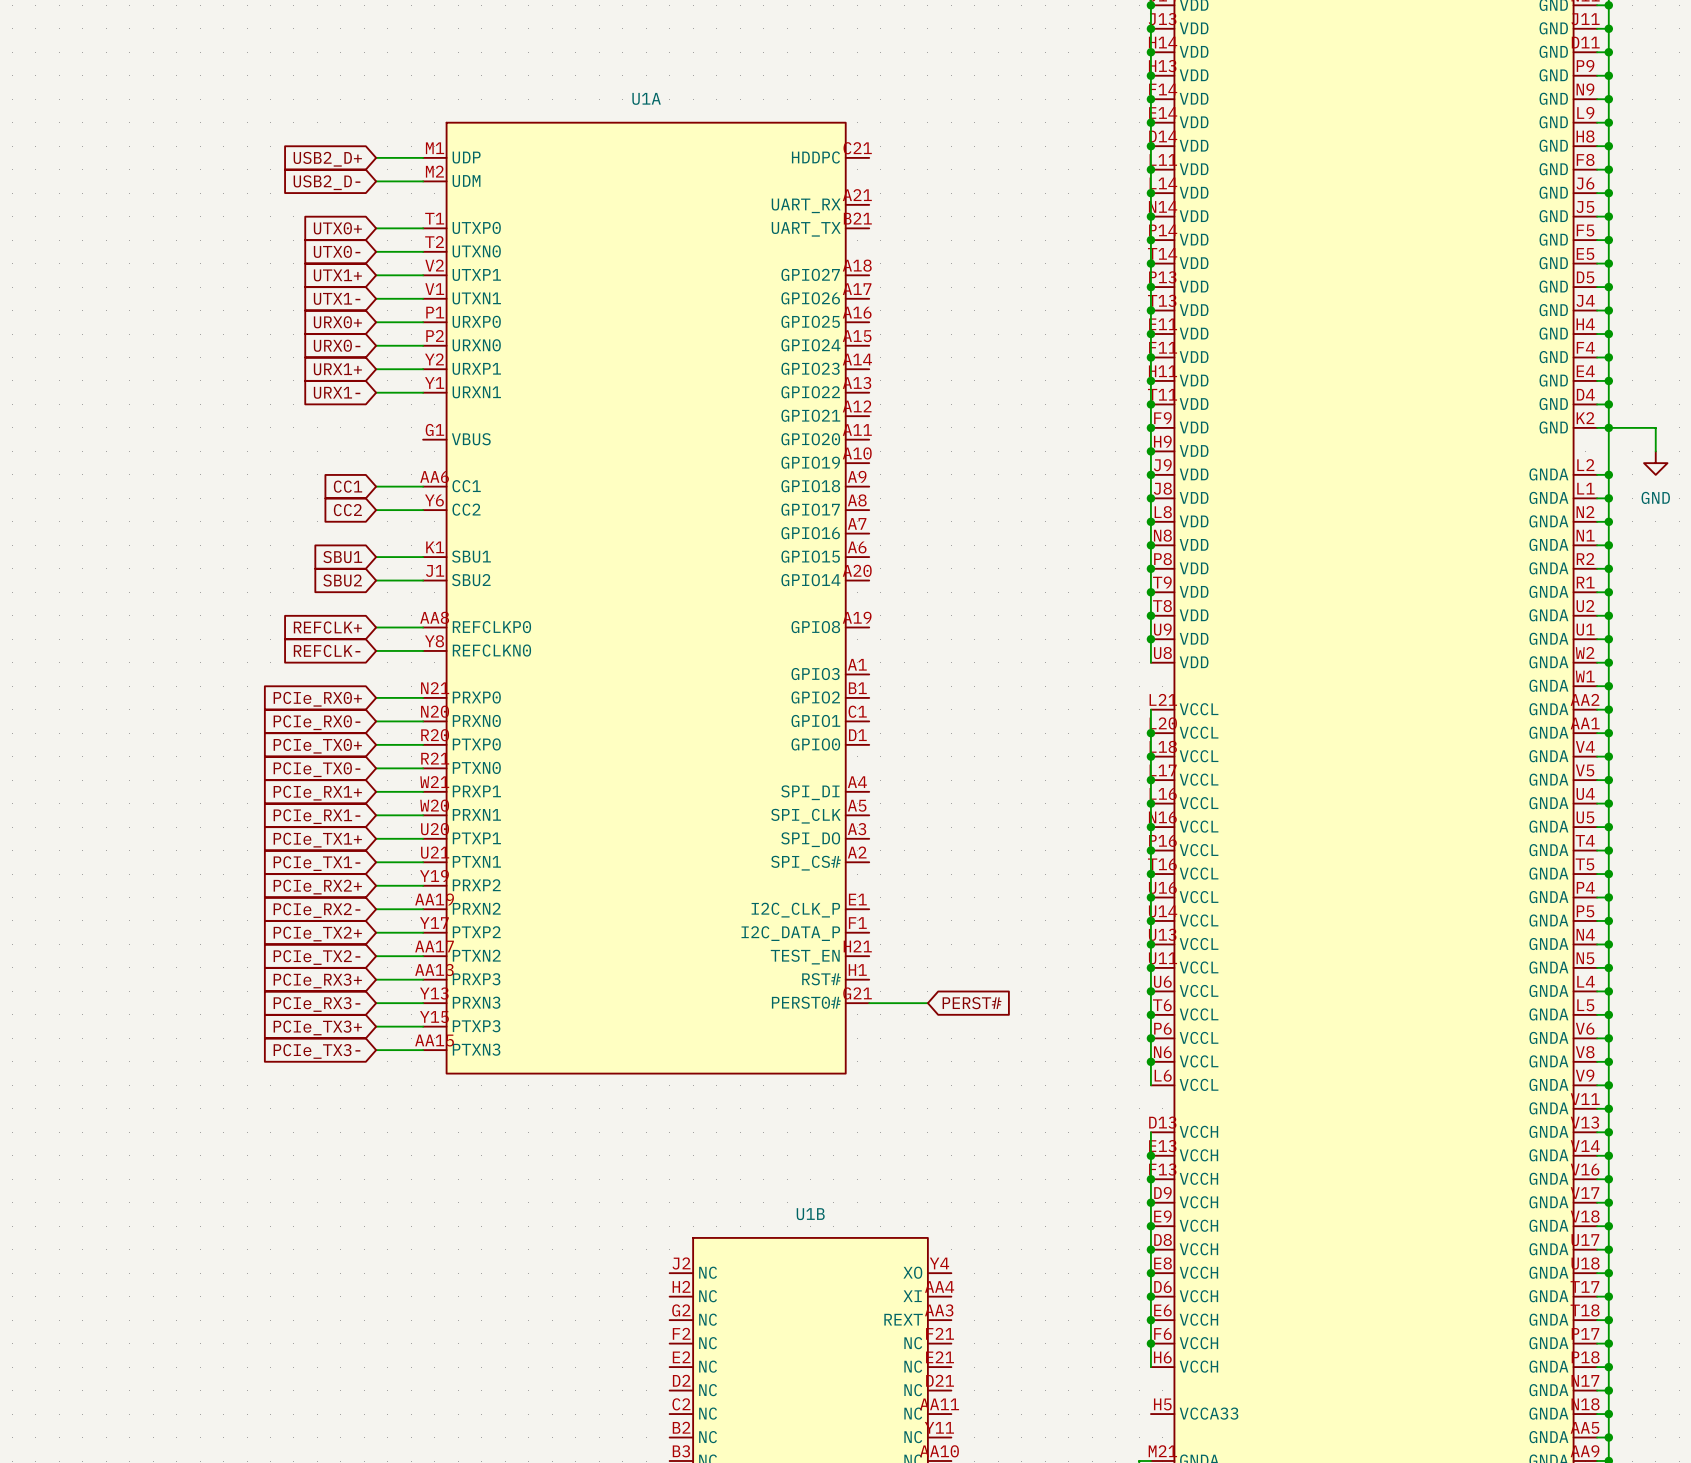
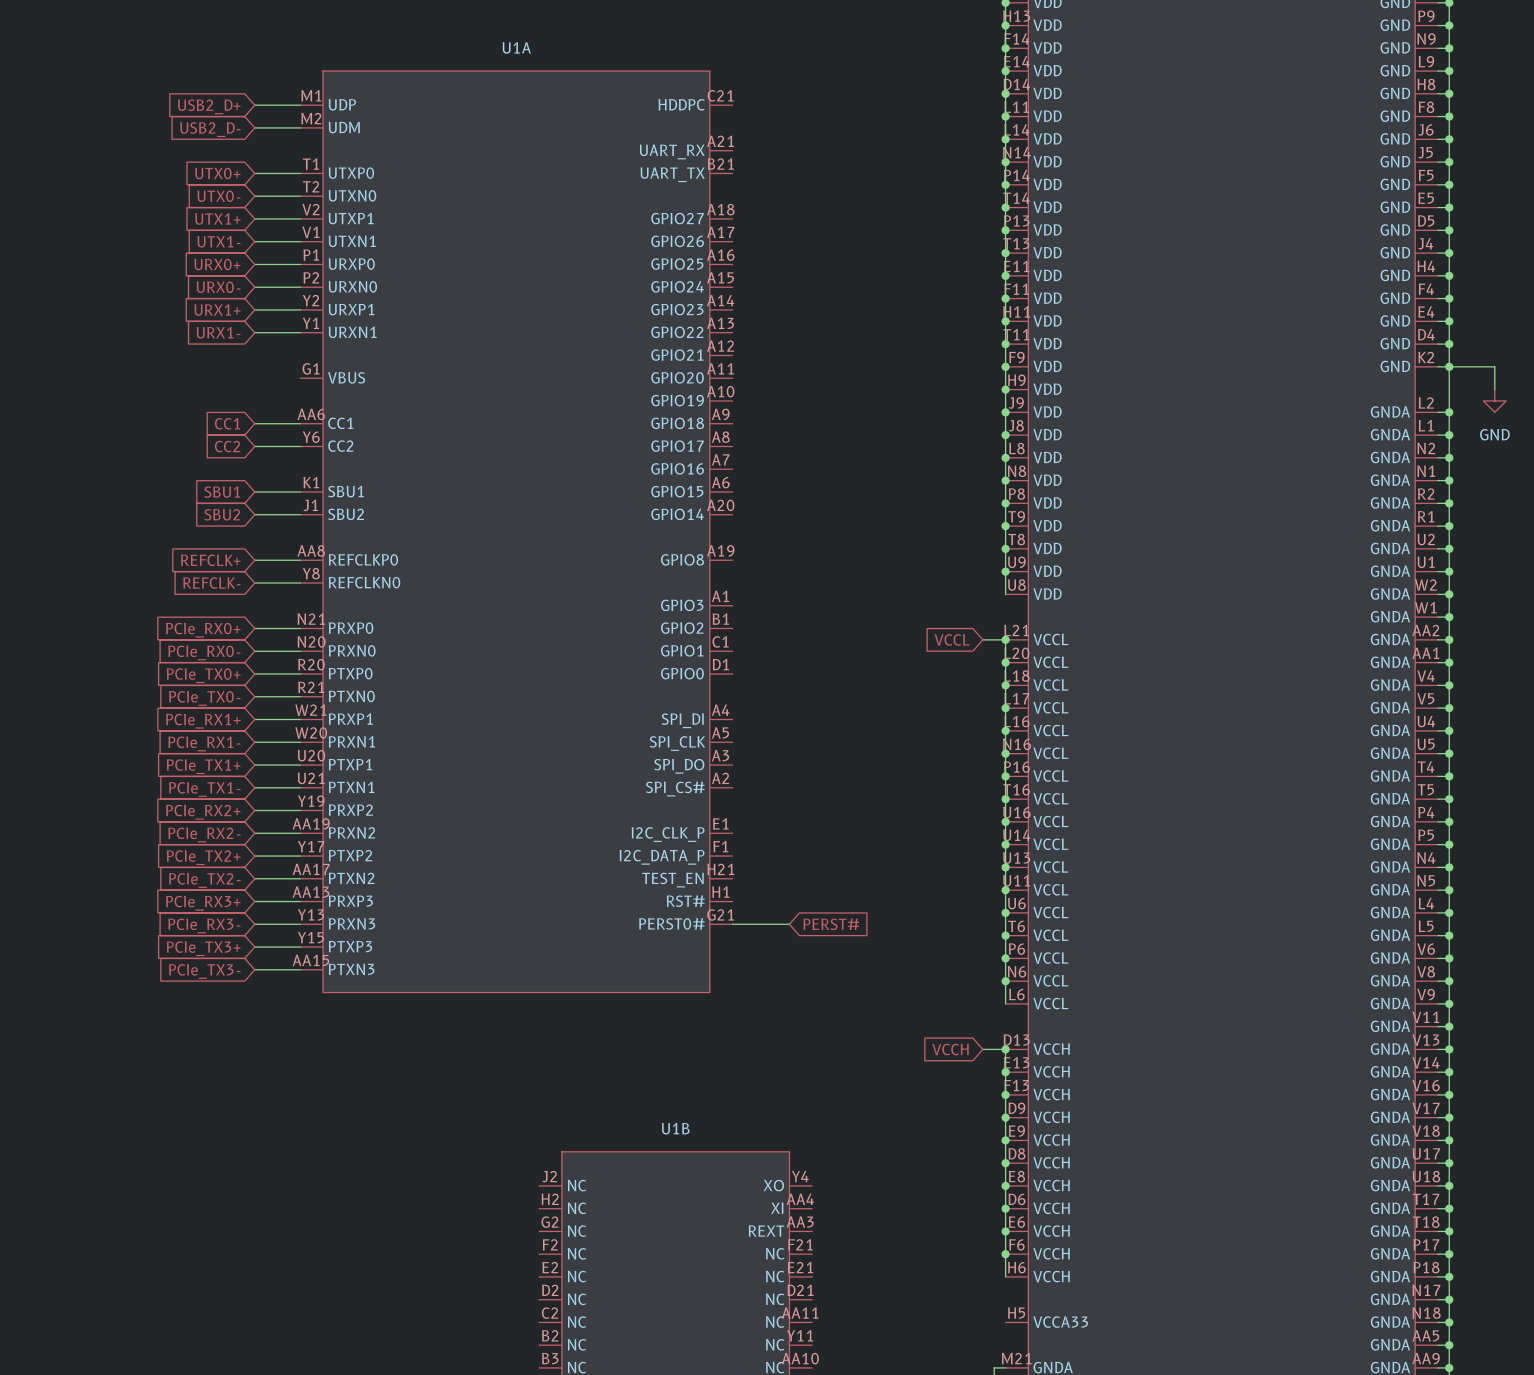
global label: none -> VCCL (952, 639)
wire: none -> (982, 639) (1005, 639)
junction: none -> (1005, 639)
global label: none -> VCCH (950, 1049)
wire: none -> (982, 1049) (1005, 1049)
junction: none -> (1005, 1049)

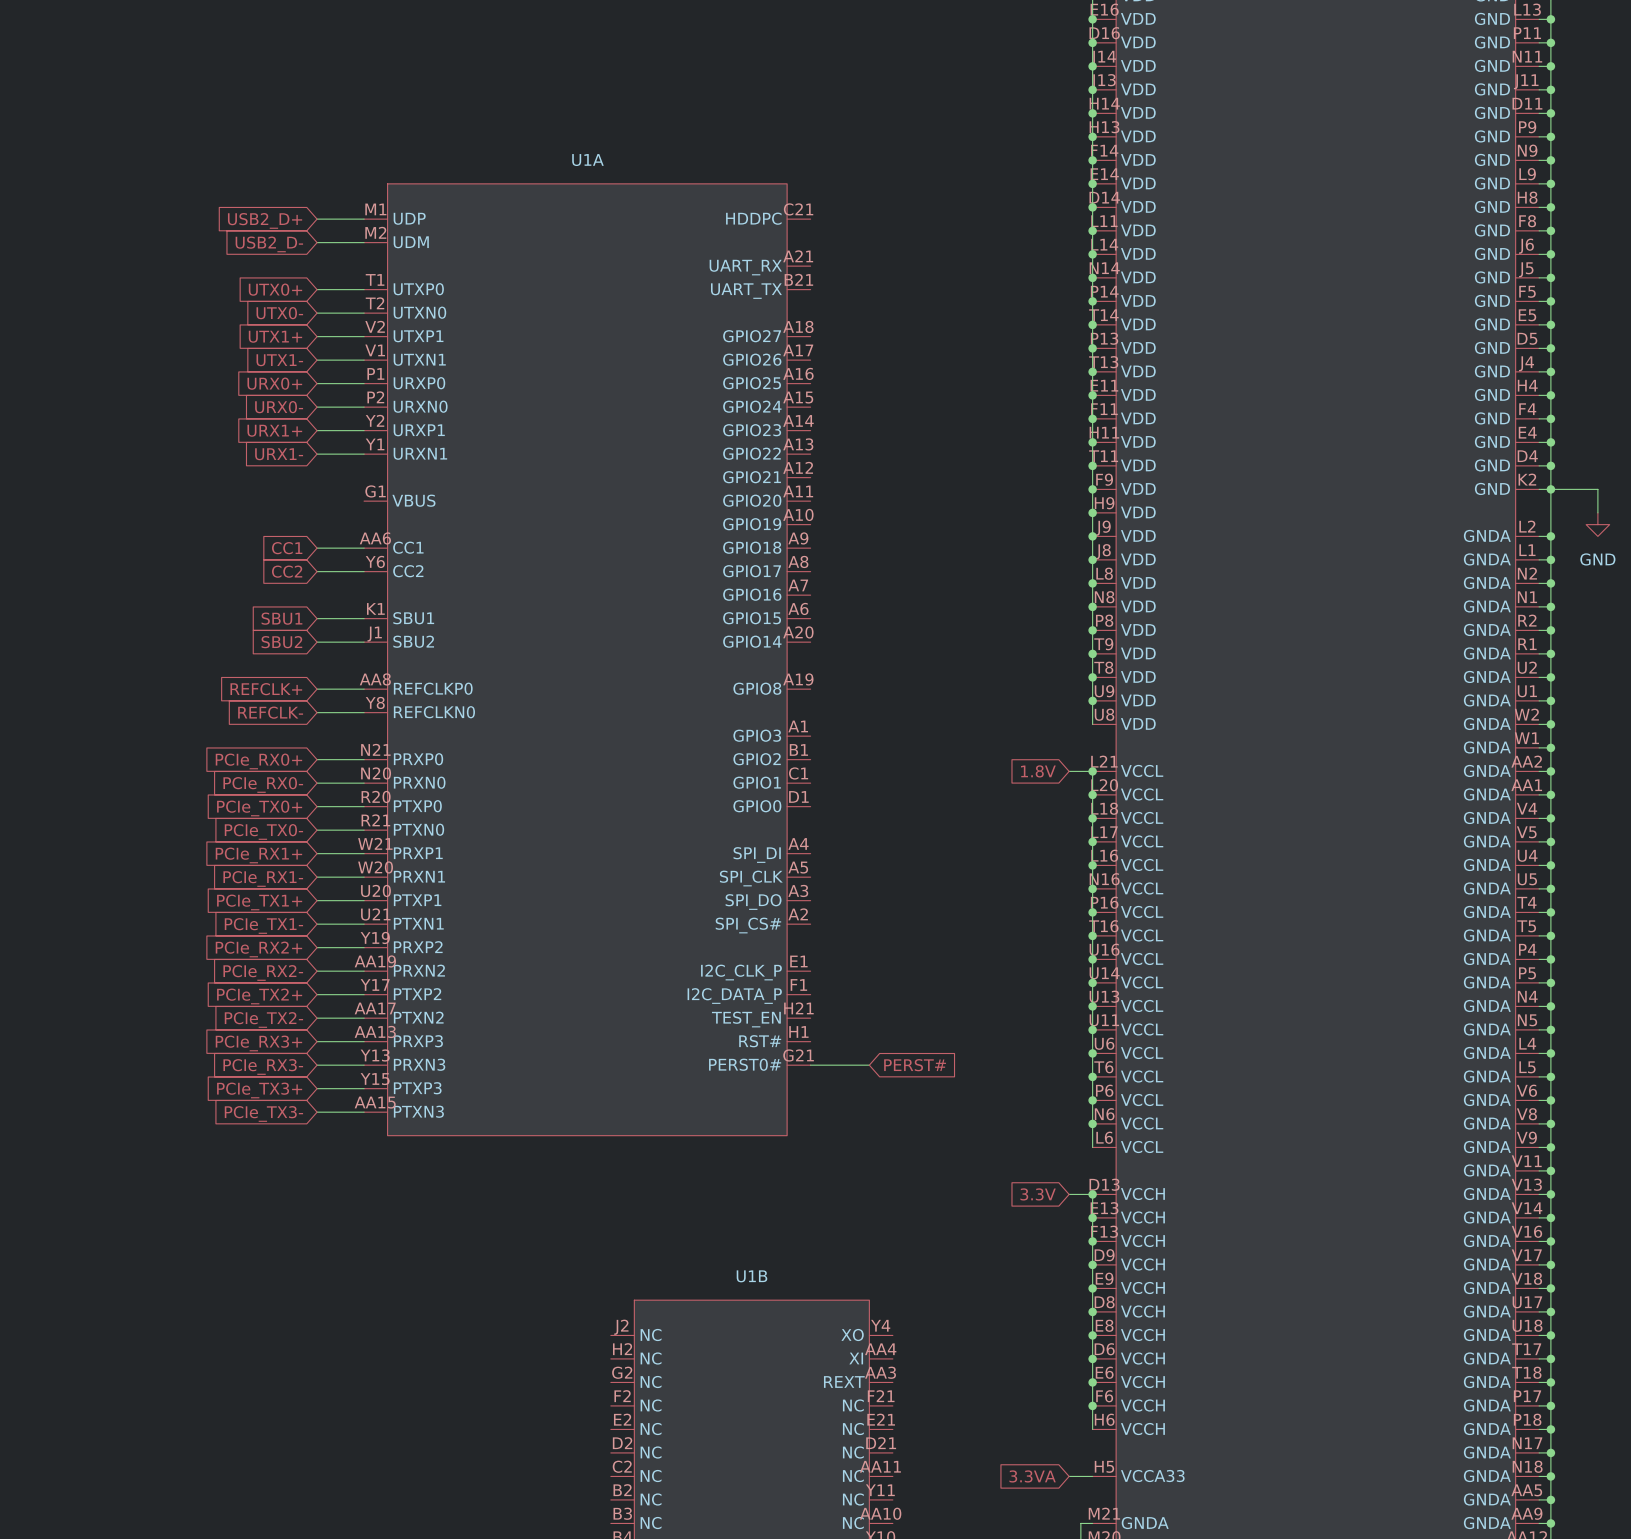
global label: VCCL (952, 639) -> 1.8V (1038, 771)
global label: VCCH (950, 1049) -> 3.3V (1038, 1194)
global label: none -> 3.3VA (1032, 1476)
wire: none -> (1069, 1476) (1092, 1476)

